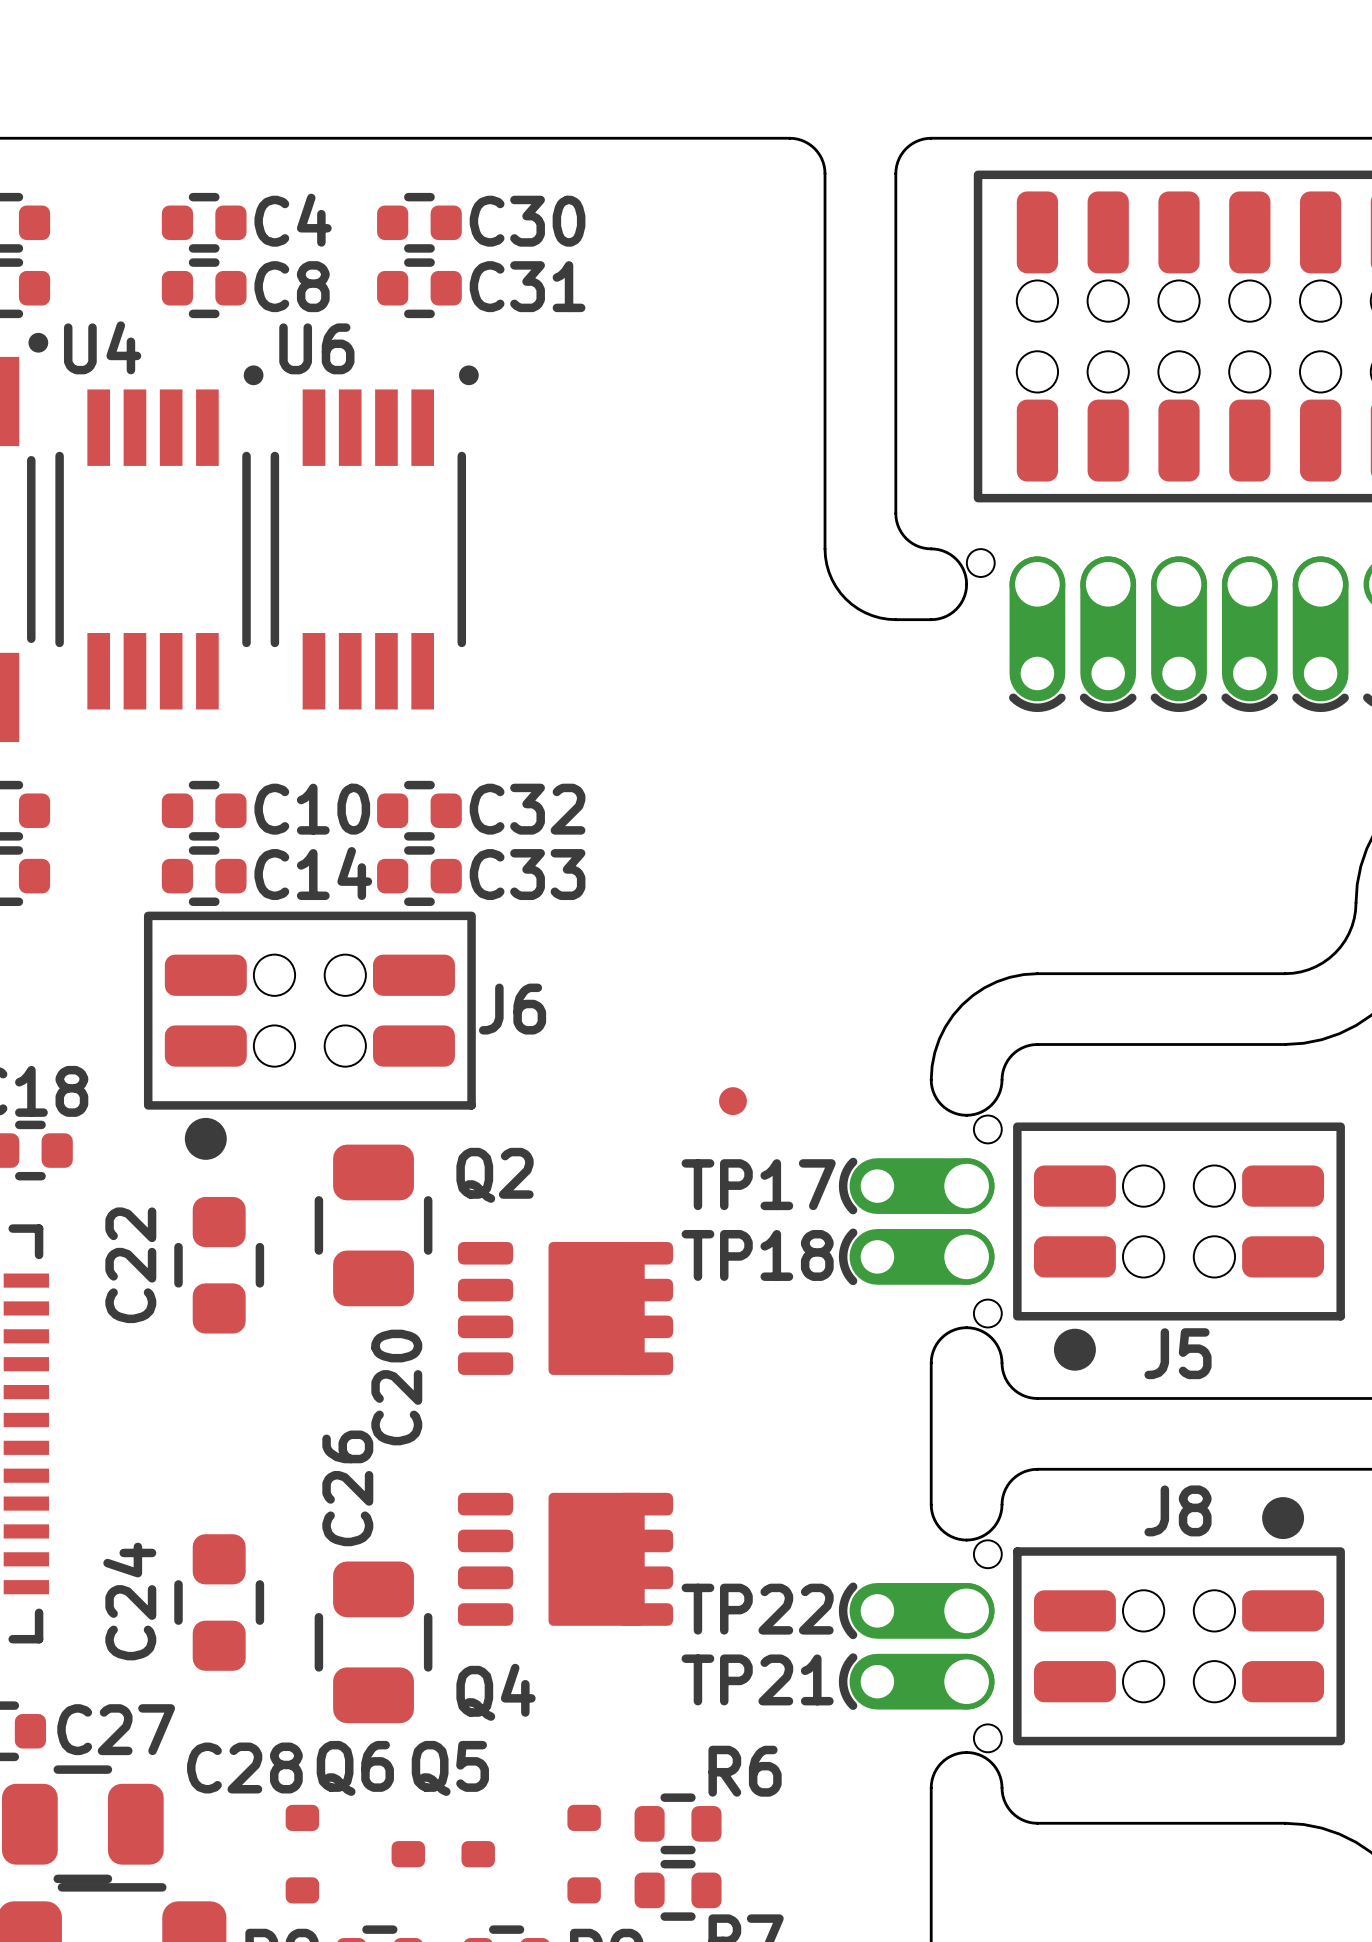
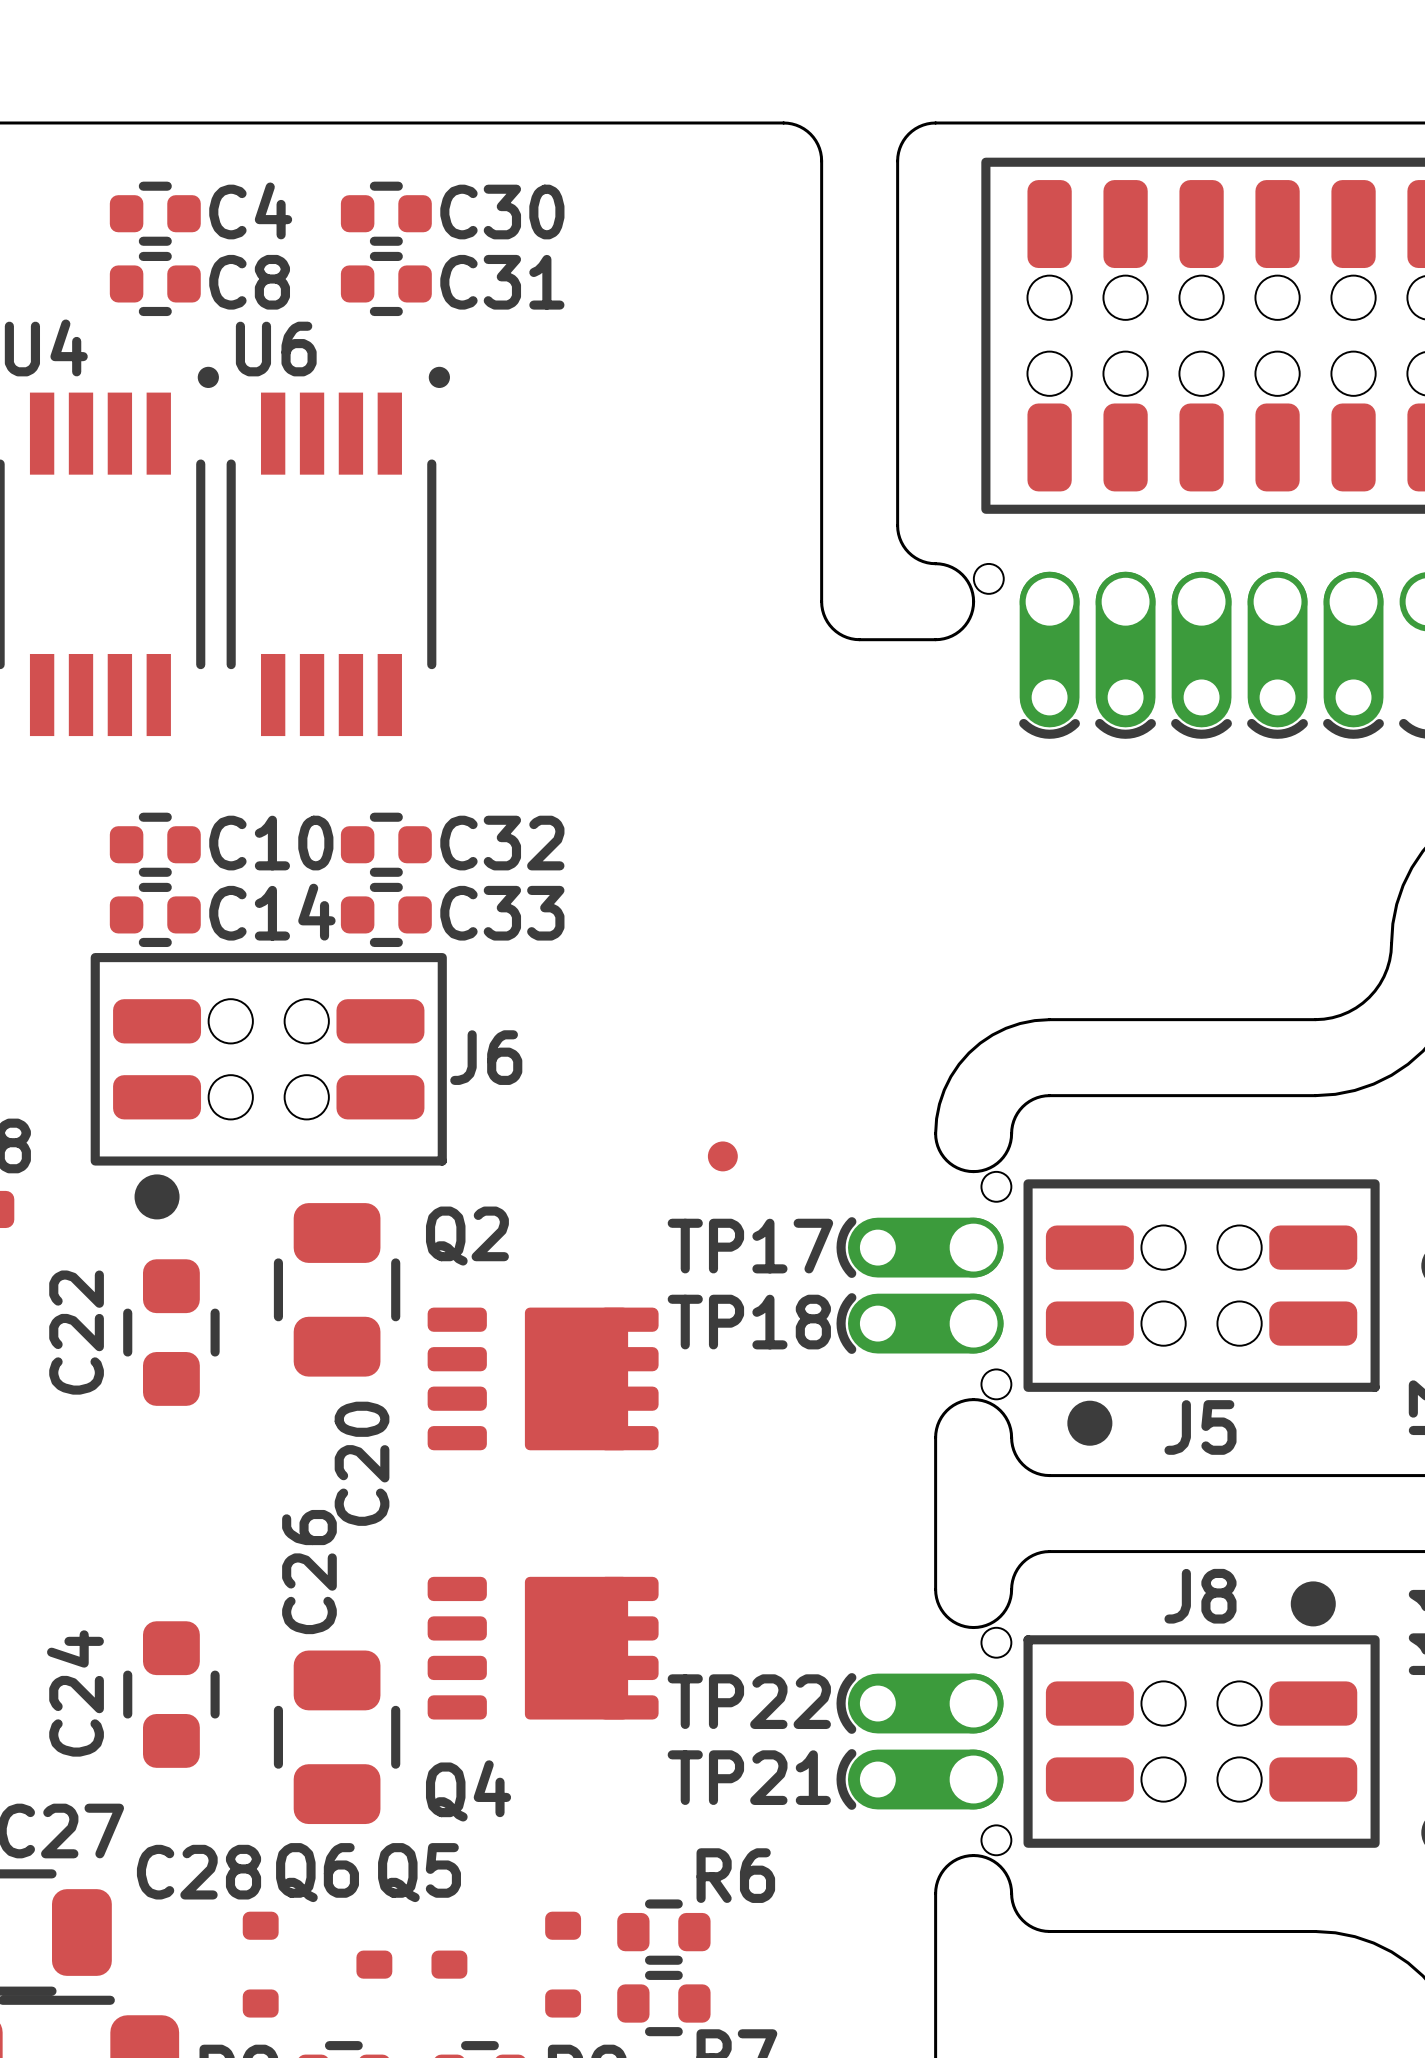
board edge: (825, 548) (828, 572) (835, 586) (845, 598) (858, 608) (872, 615) (895, 619) -> (821, 563) (822, 610) (832, 628) (851, 638) (897, 639)

